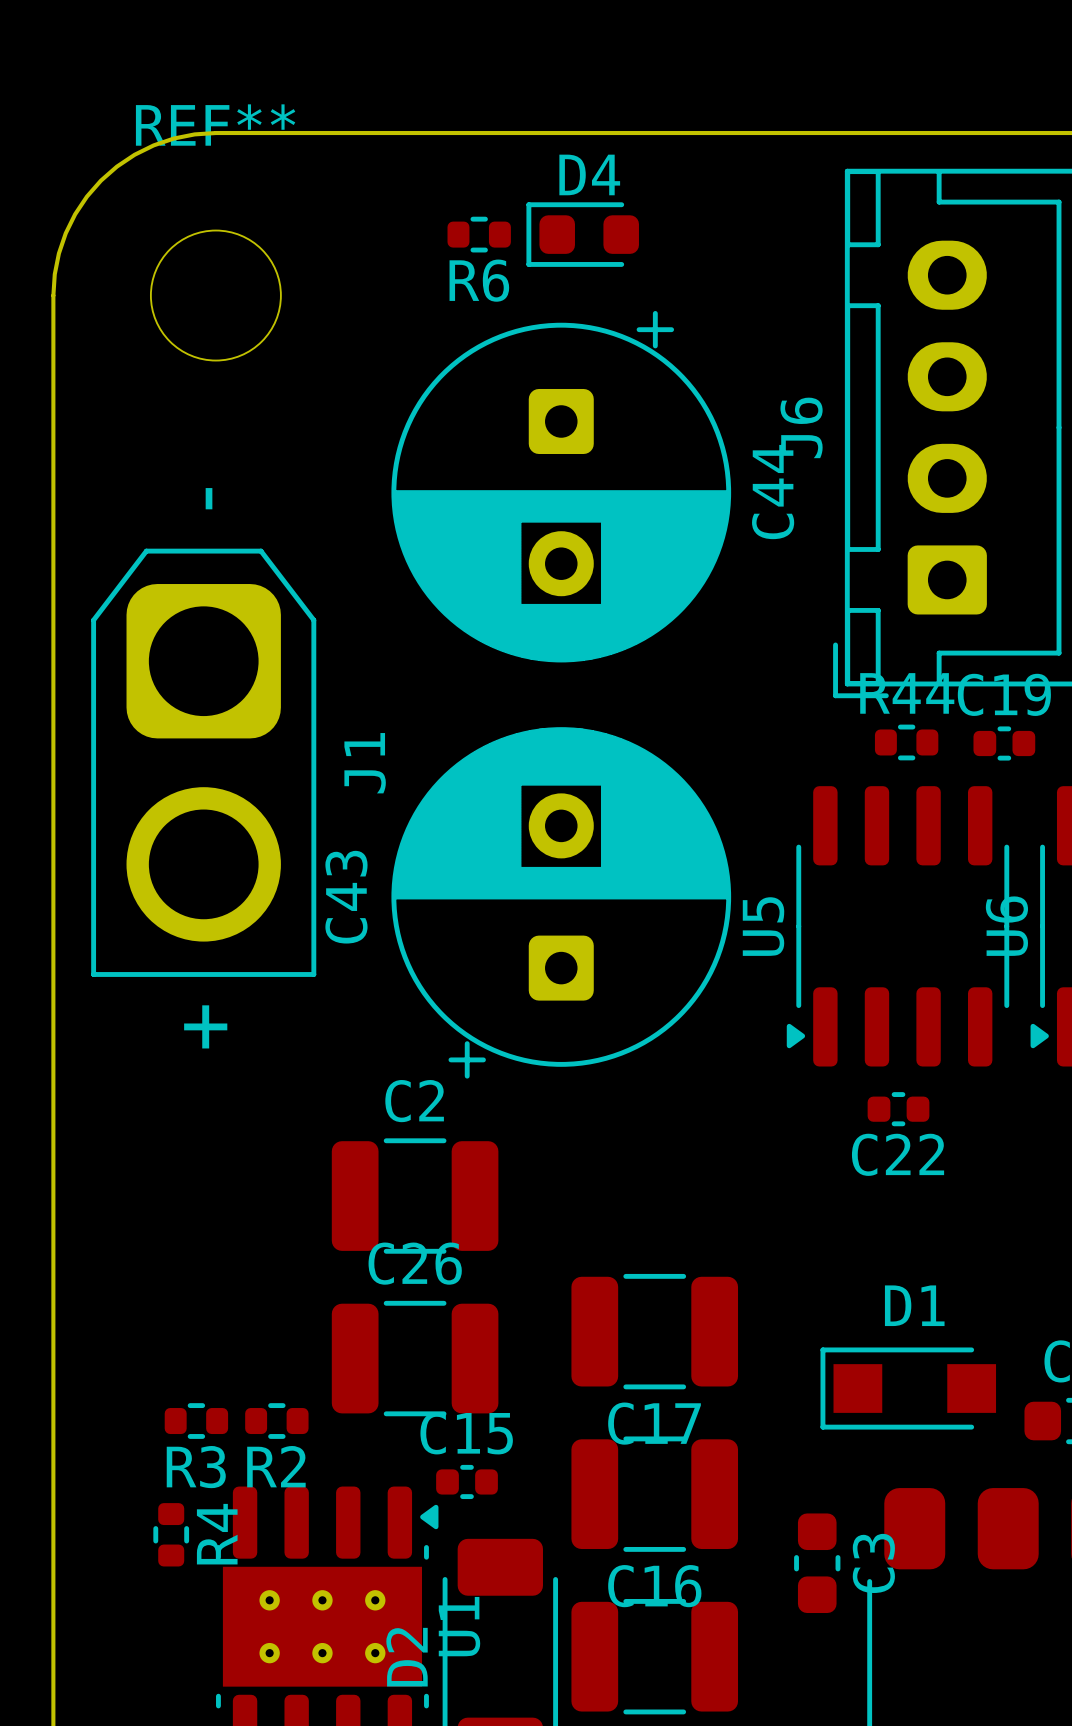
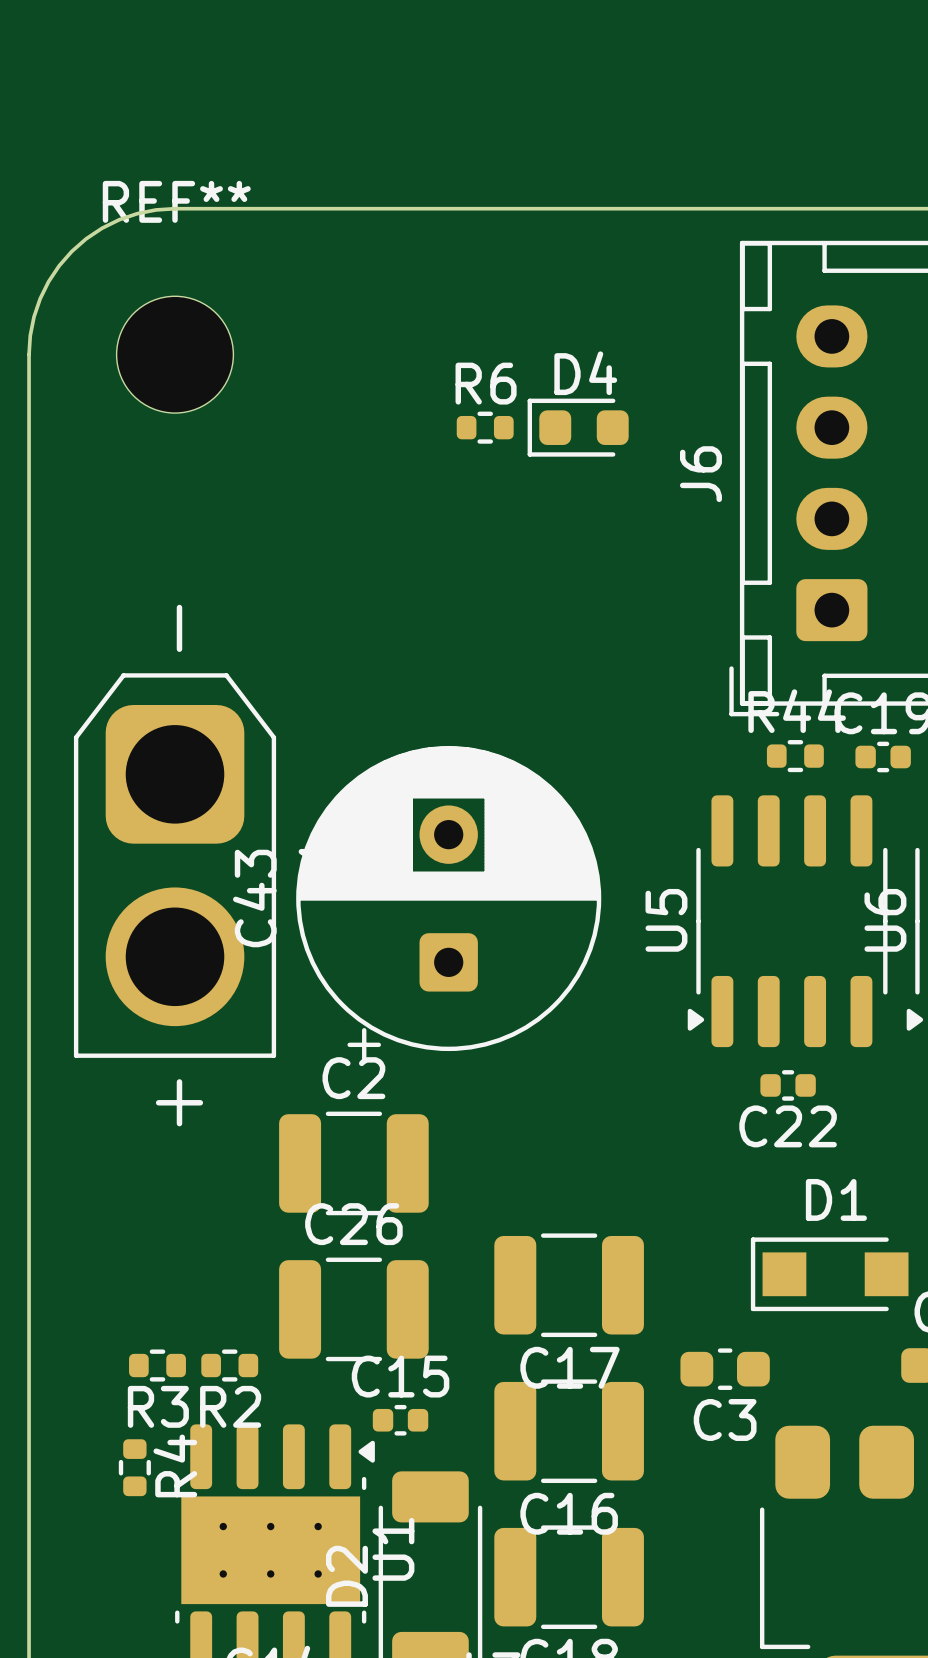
R6 position: (479, 234) -> (485, 427)
D4 position: (582, 234) -> (578, 427)
R6 name position: R6 (479, 280) -> R6 (486, 383)
C44: (561, 486) -> none
J1 position: (203, 762) -> (175, 865)
C43 position: (561, 902) -> (448, 903)
D1 position: (908, 1388) -> (829, 1274)
C3 rotation: 0° (817, 1563) -> 90° clockwise (725, 1369)
C3 position: (817, 1563) -> (725, 1369)

